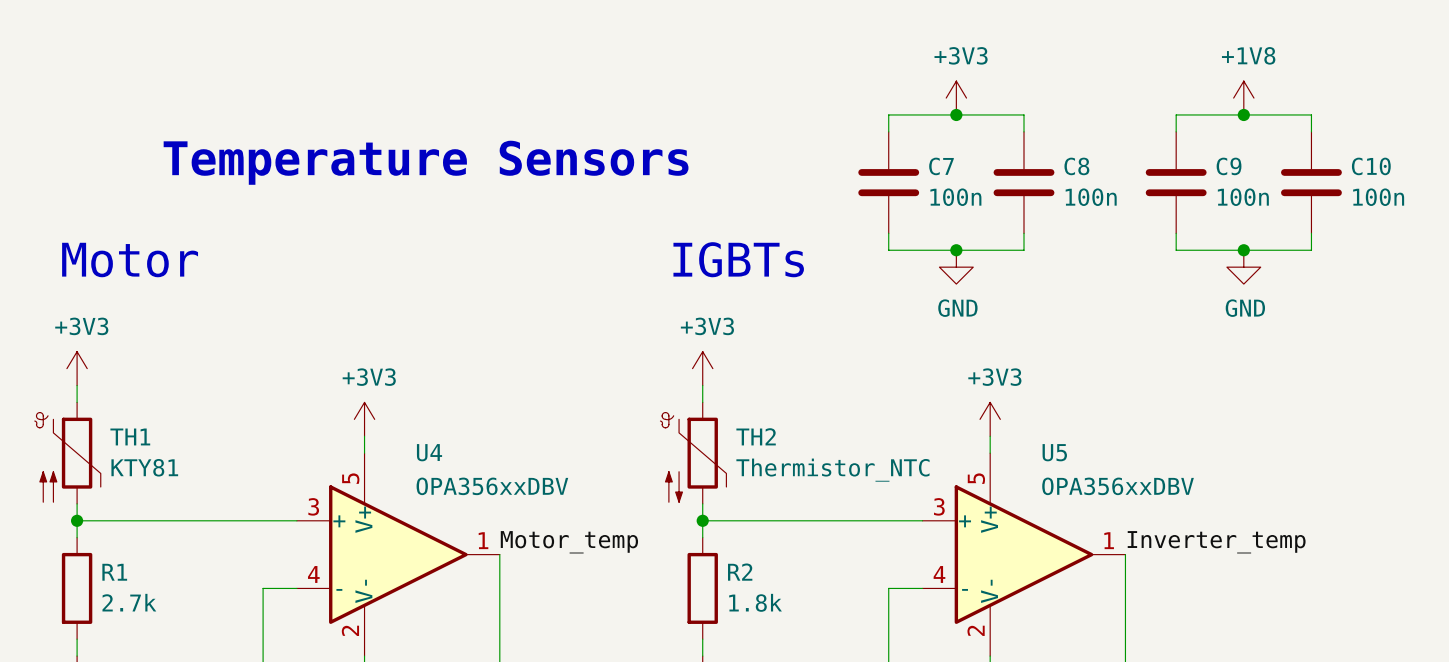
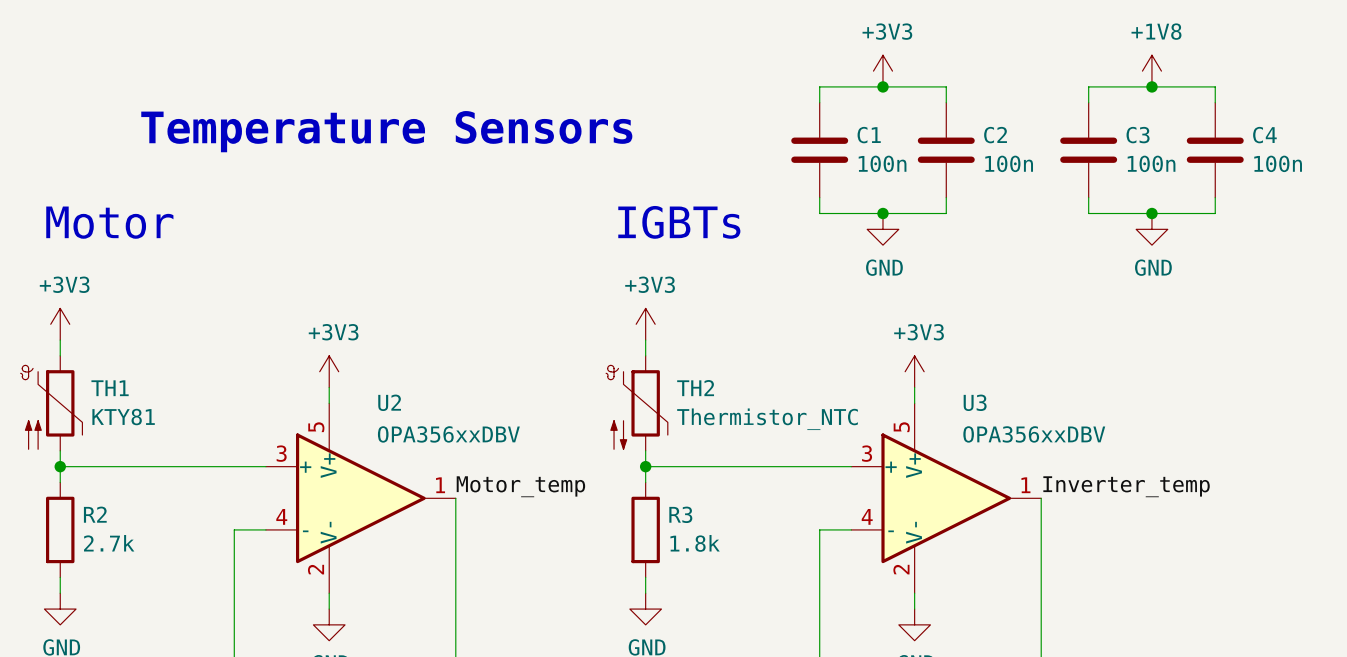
C7 name: C7 (941, 166) -> C1 (869, 135)
C8 name: C8 (1076, 166) -> C2 (995, 135)
C9 name: C9 (1229, 166) -> C3 (1138, 135)
C10 name: C10 (1371, 166) -> C4 (1264, 135)
U4 name: U4 (429, 452) -> U2 (389, 402)
U5 name: U5 (1054, 452) -> U3 (975, 402)
R1 name: R1 (114, 572) -> R2 (95, 514)
R2 name: R2 (740, 572) -> R3 (680, 514)

